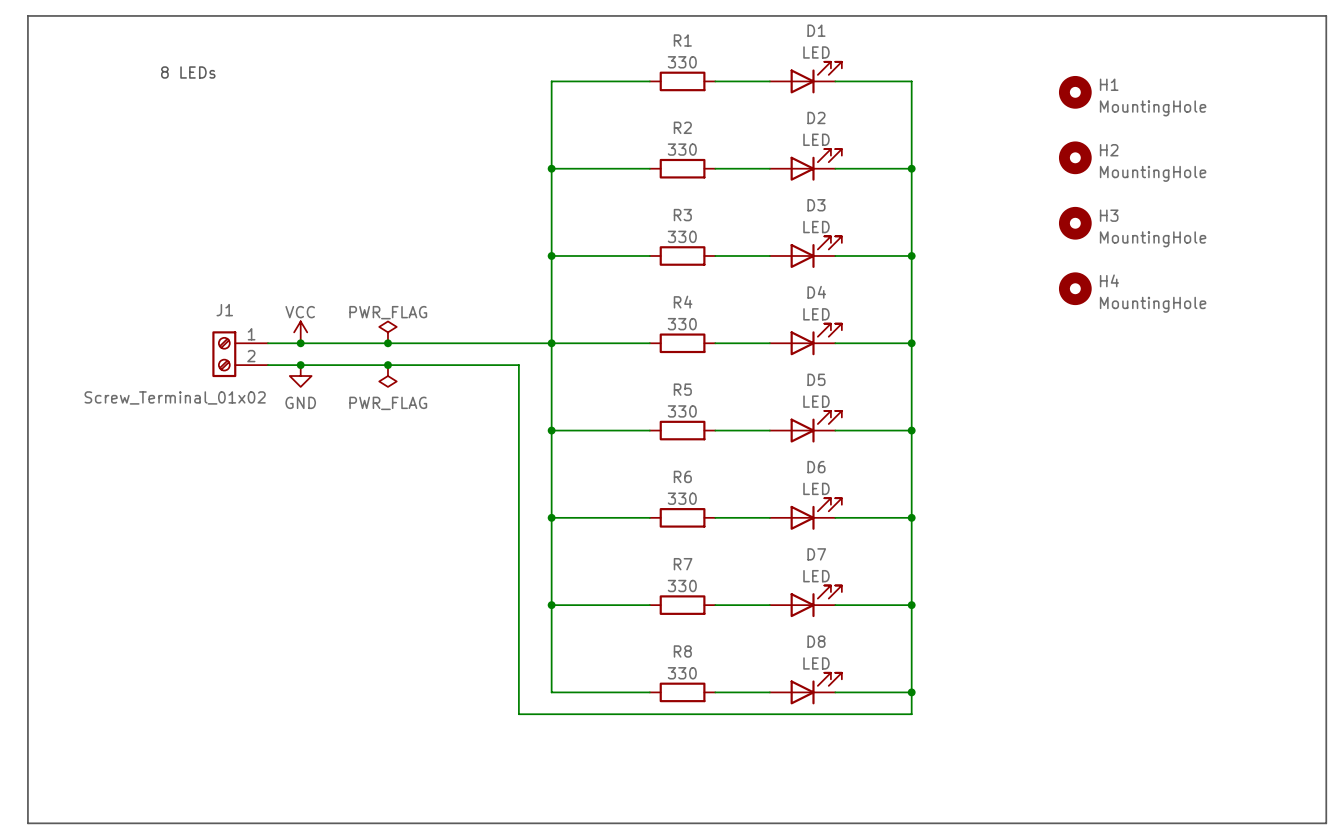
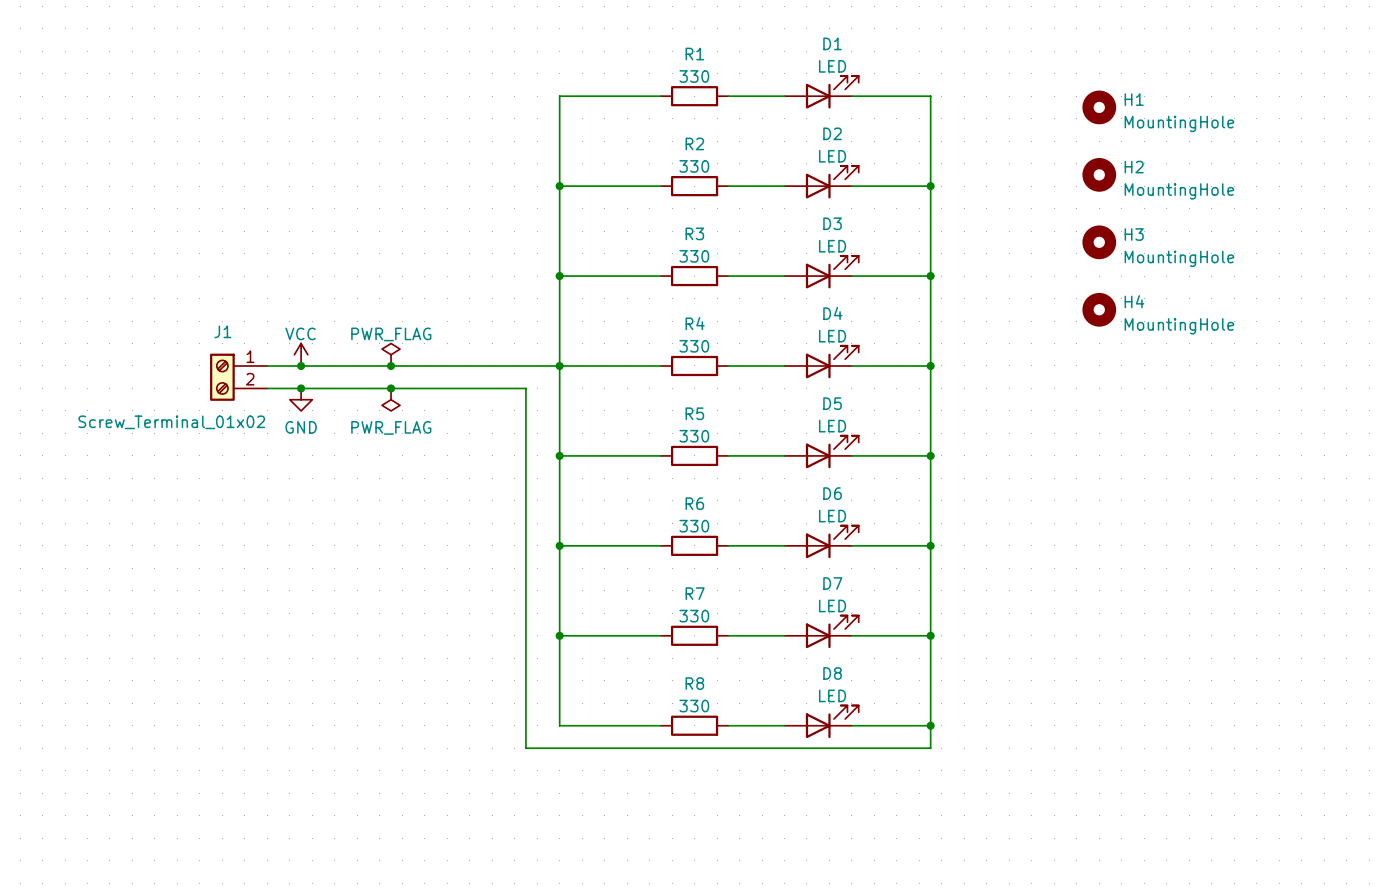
line: (27, 15) (1326, 15) (1326, 823) (27, 823) (27, 15) -> none
text: 8 LEDs (188, 72) -> none

